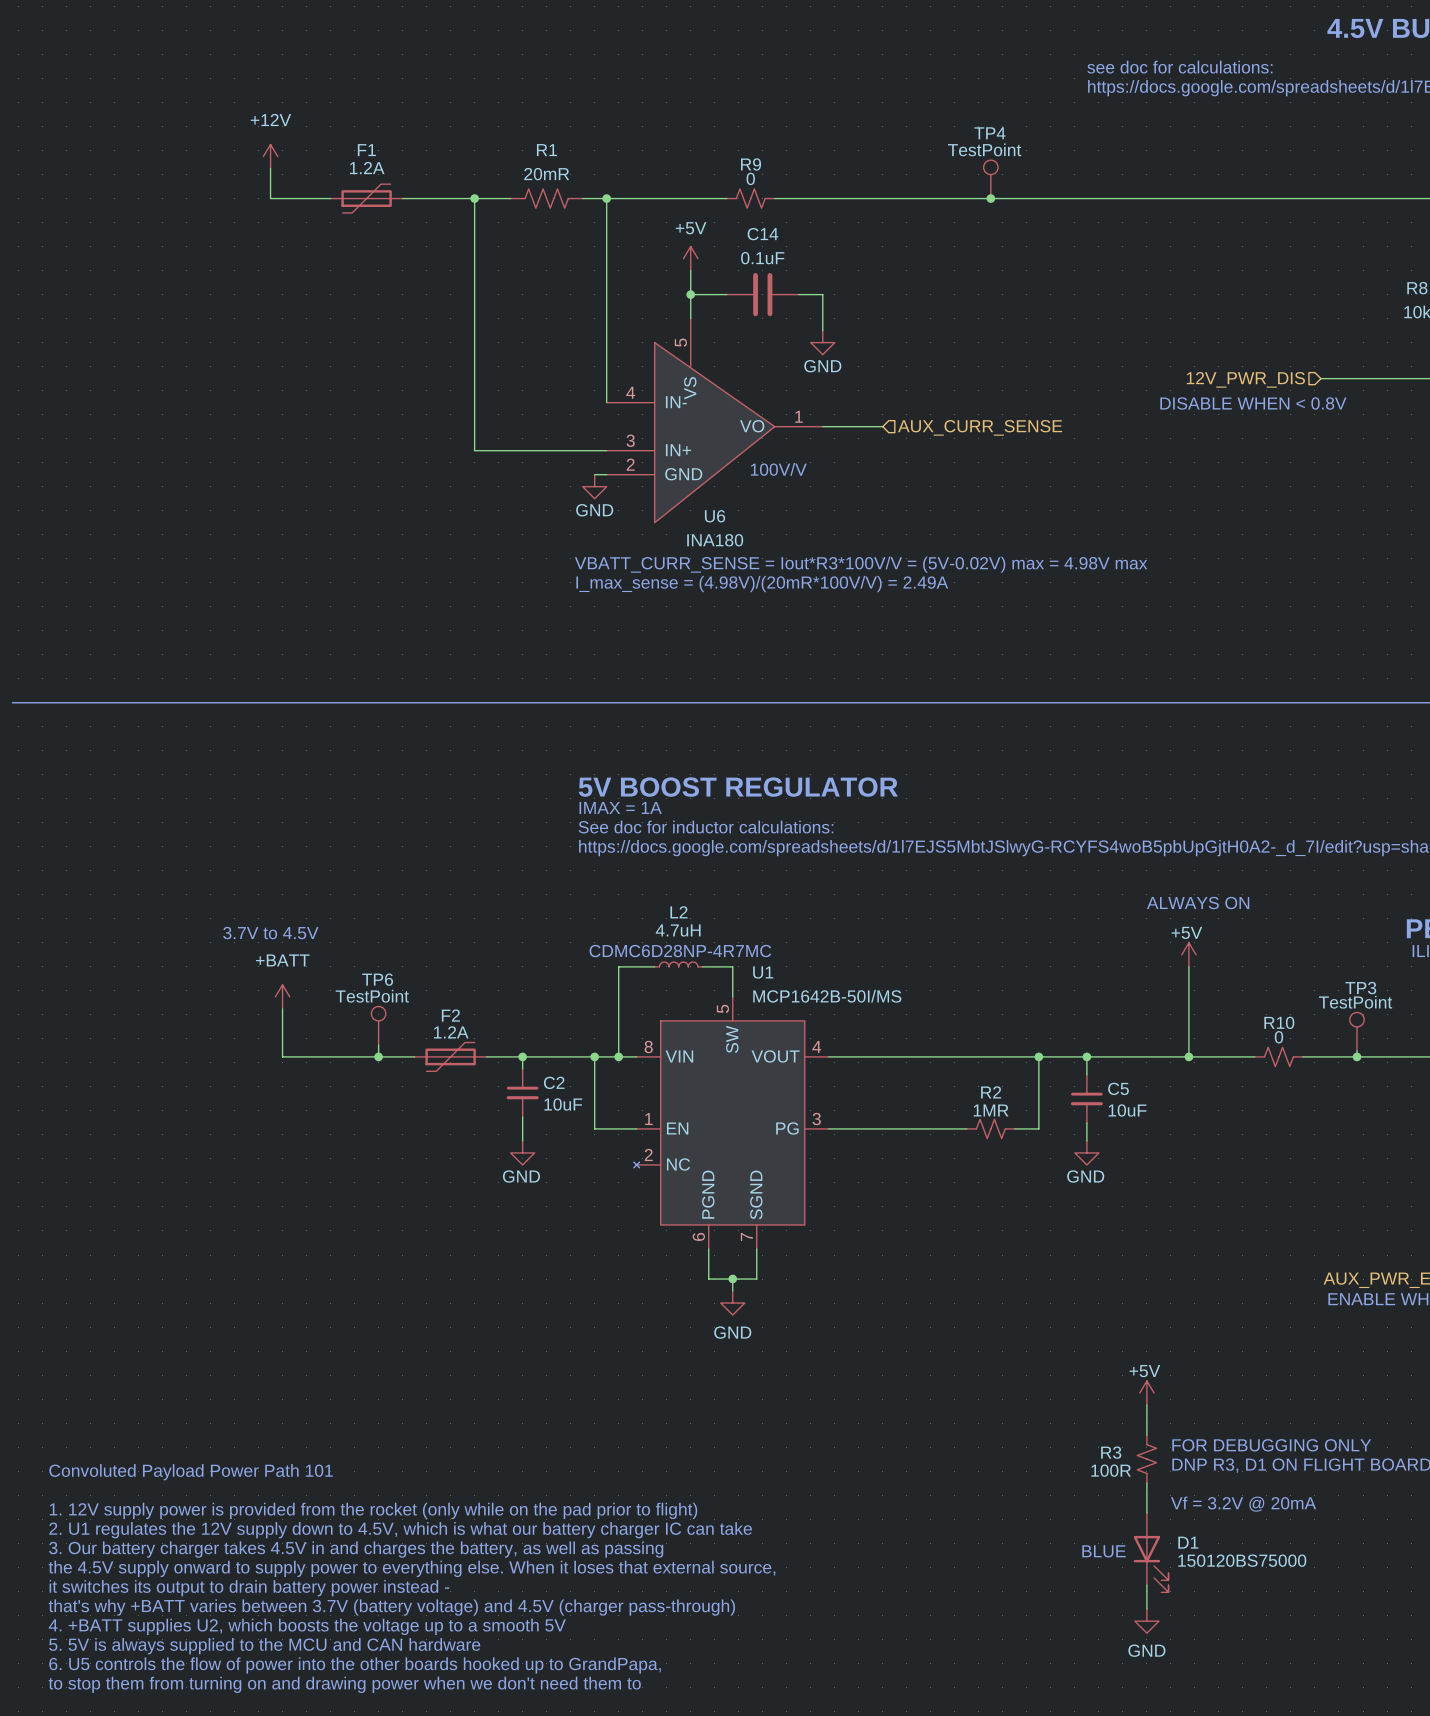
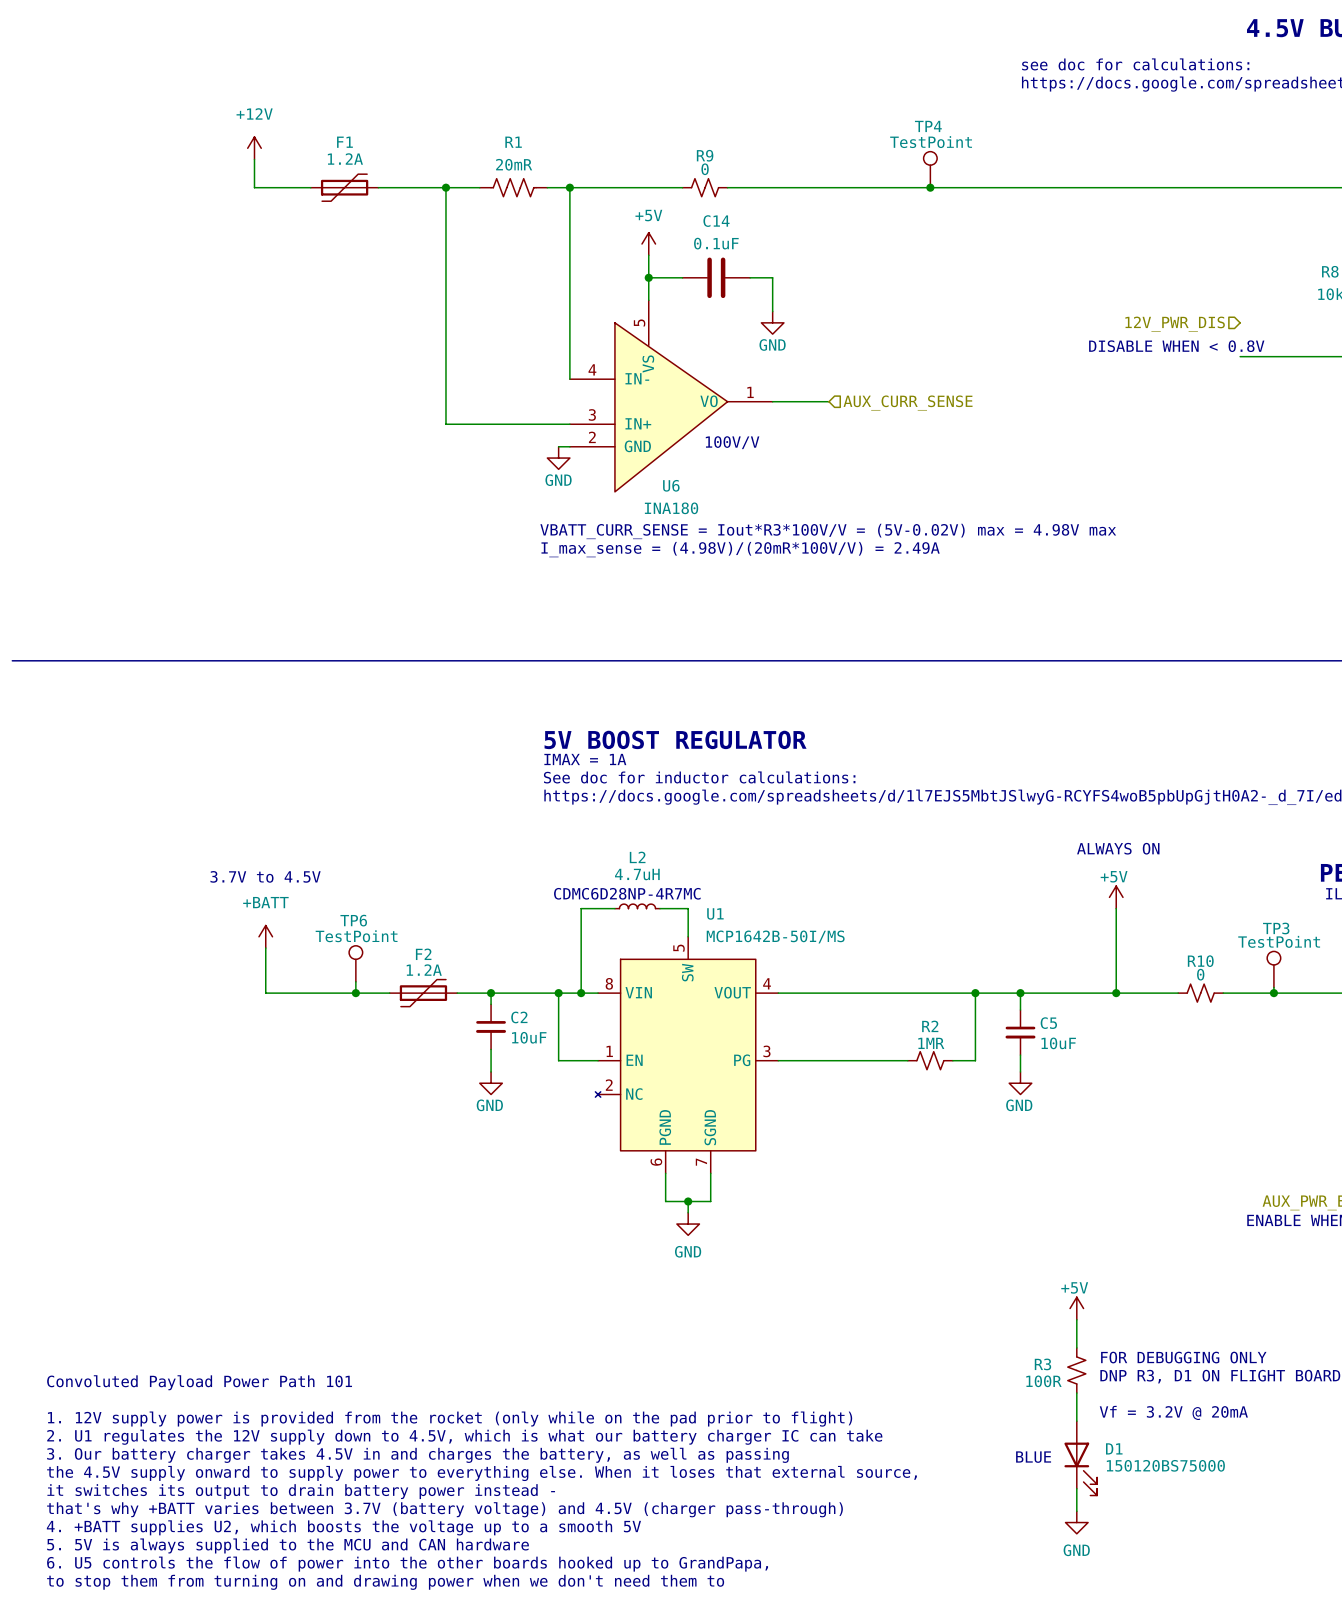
hierarchical label position: 12V_PWR_DIS (1245, 379) -> 12V_PWR_DIS (1175, 324)
text position: DISABLE WHEN < 0.8V (1253, 403) -> DISABLE WHEN < 0.8V (1176, 346)

